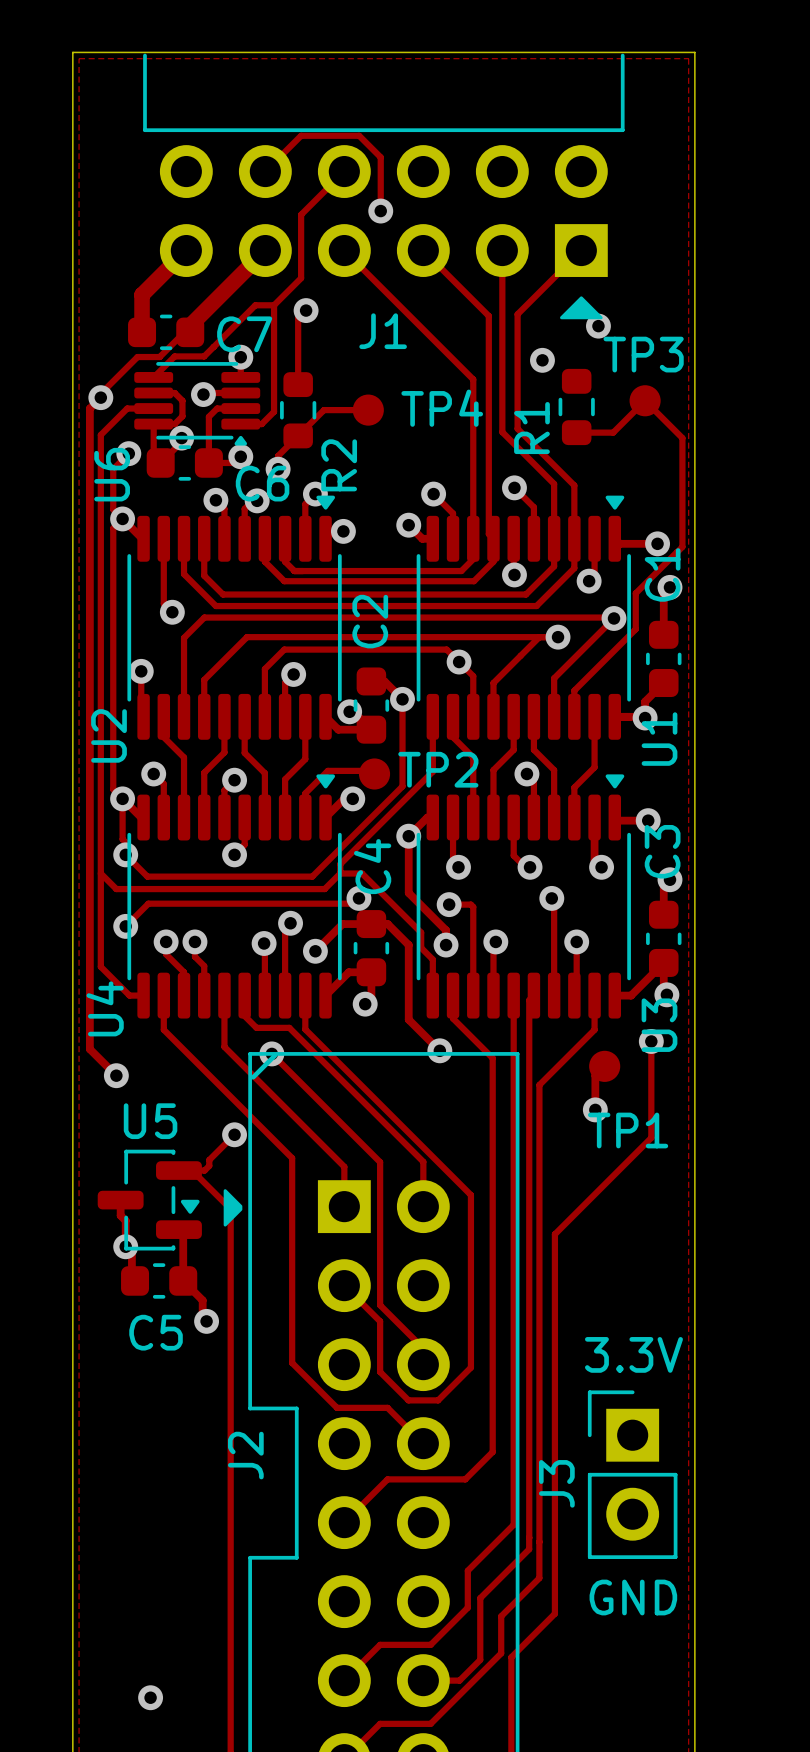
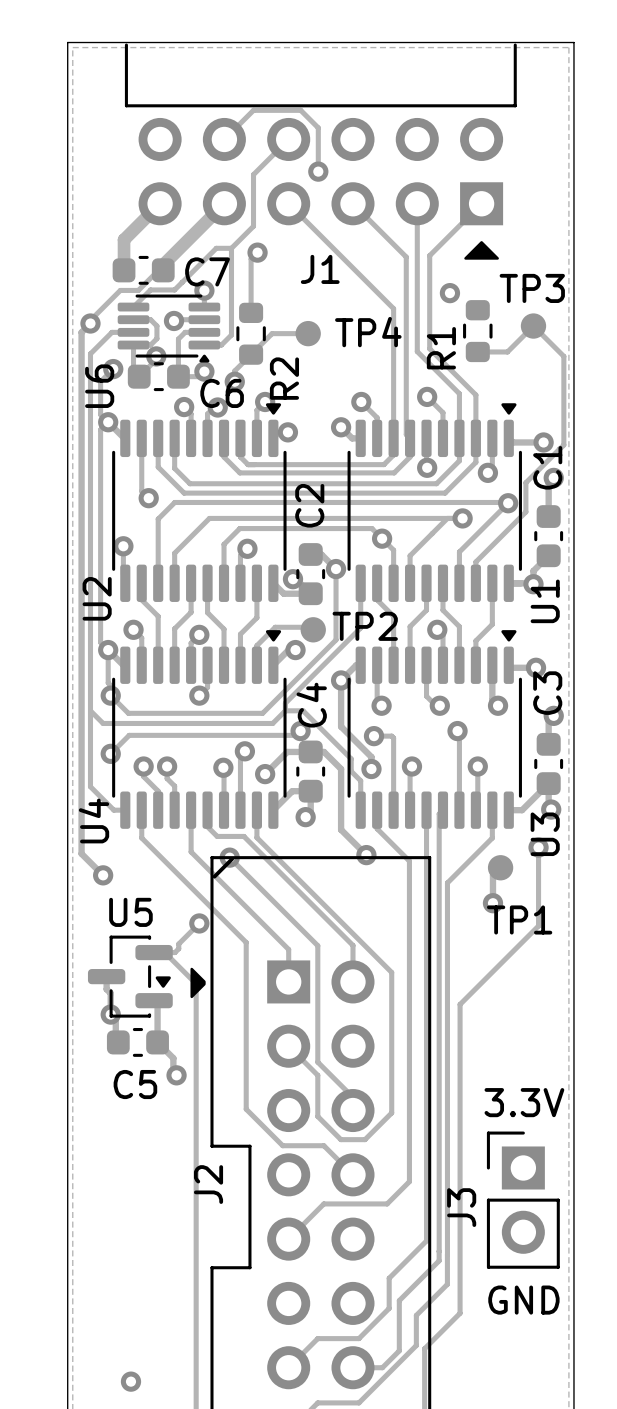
via: (598, 326) -> none

